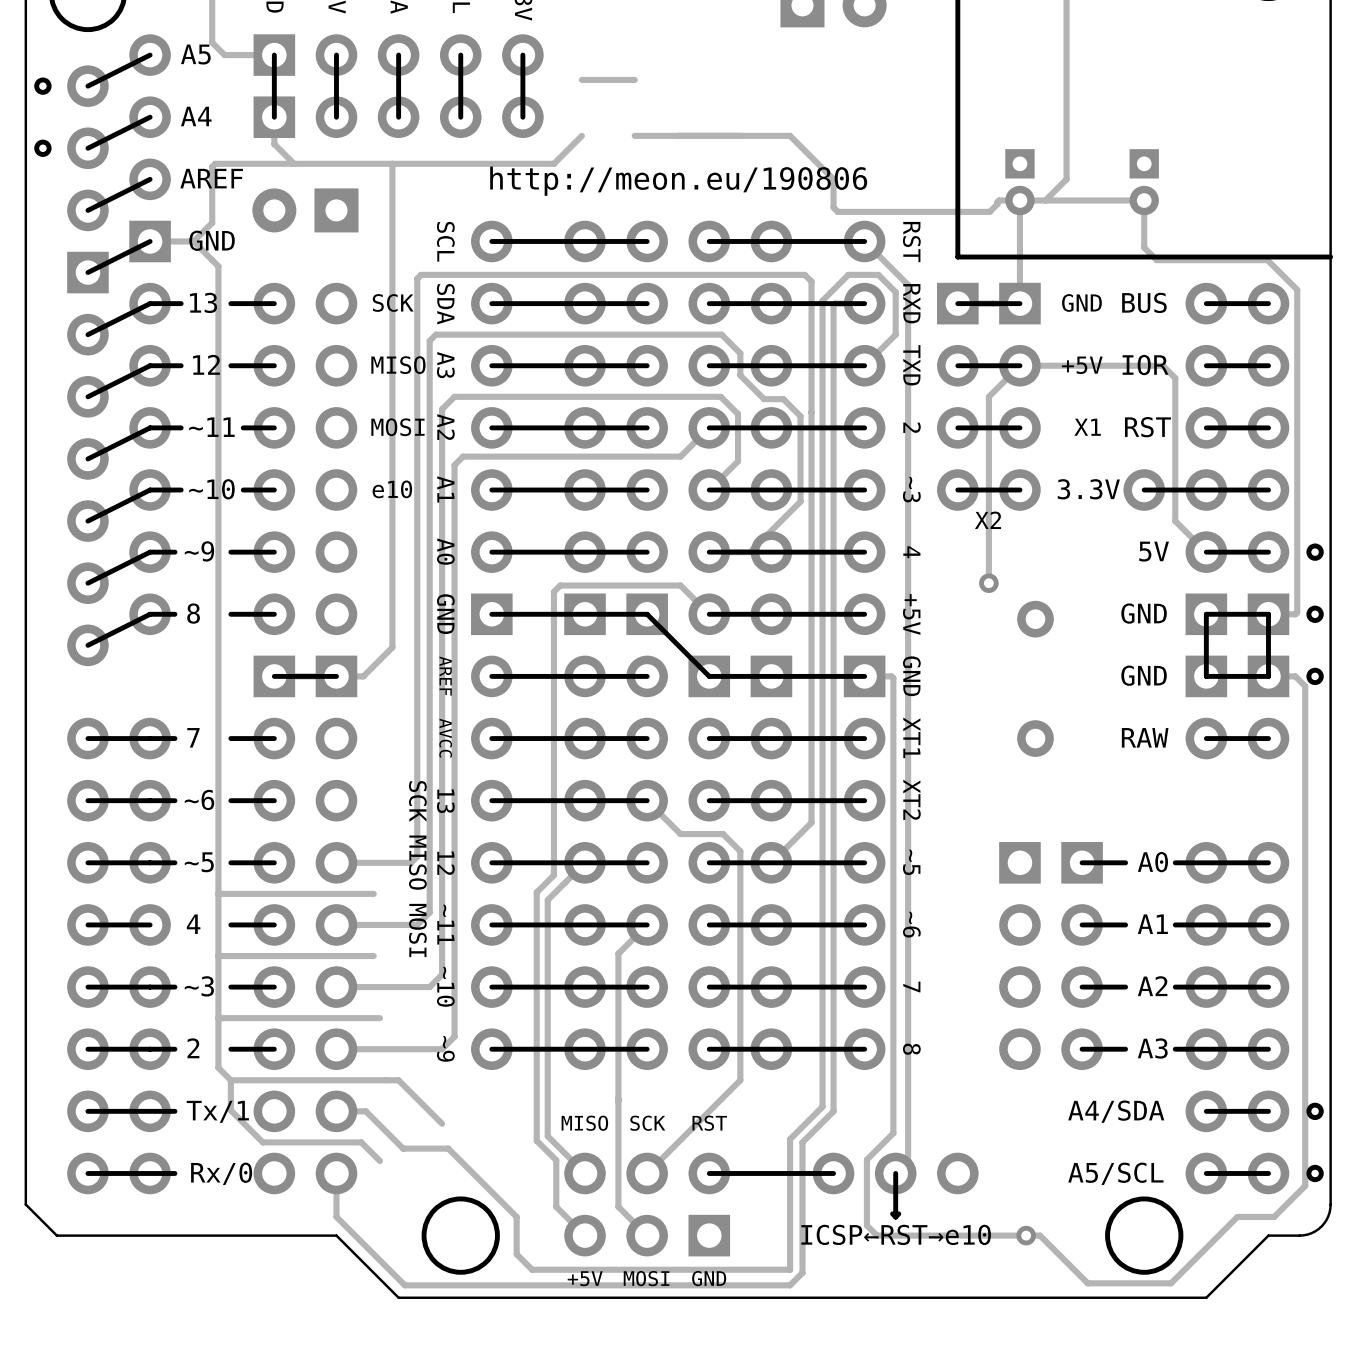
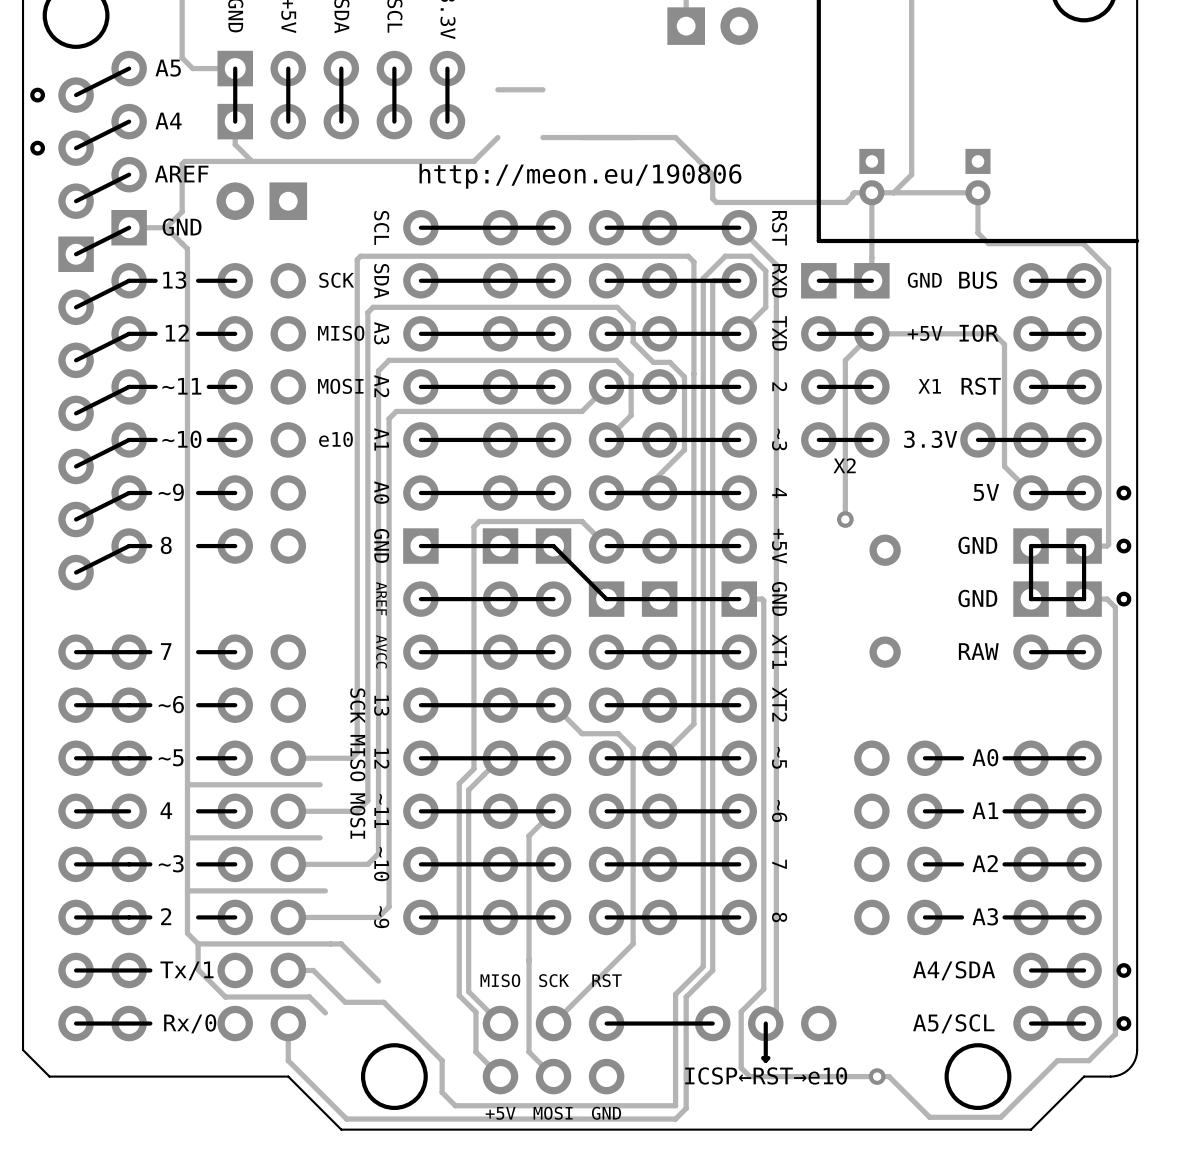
track: (392, 163) (392, 647) (363, 676) (274, 676) -> none
part: (305, 676) -> none
line: (336, 676) (274, 676) -> none
part footprint: [999, 842, 1041, 1071] -> [854, 740, 890, 936]
part footprint: [1061, 842, 1103, 1071] -> [907, 740, 943, 936]
part footprint: [564, 1152, 731, 1257] -> [482, 1005, 625, 1095]

